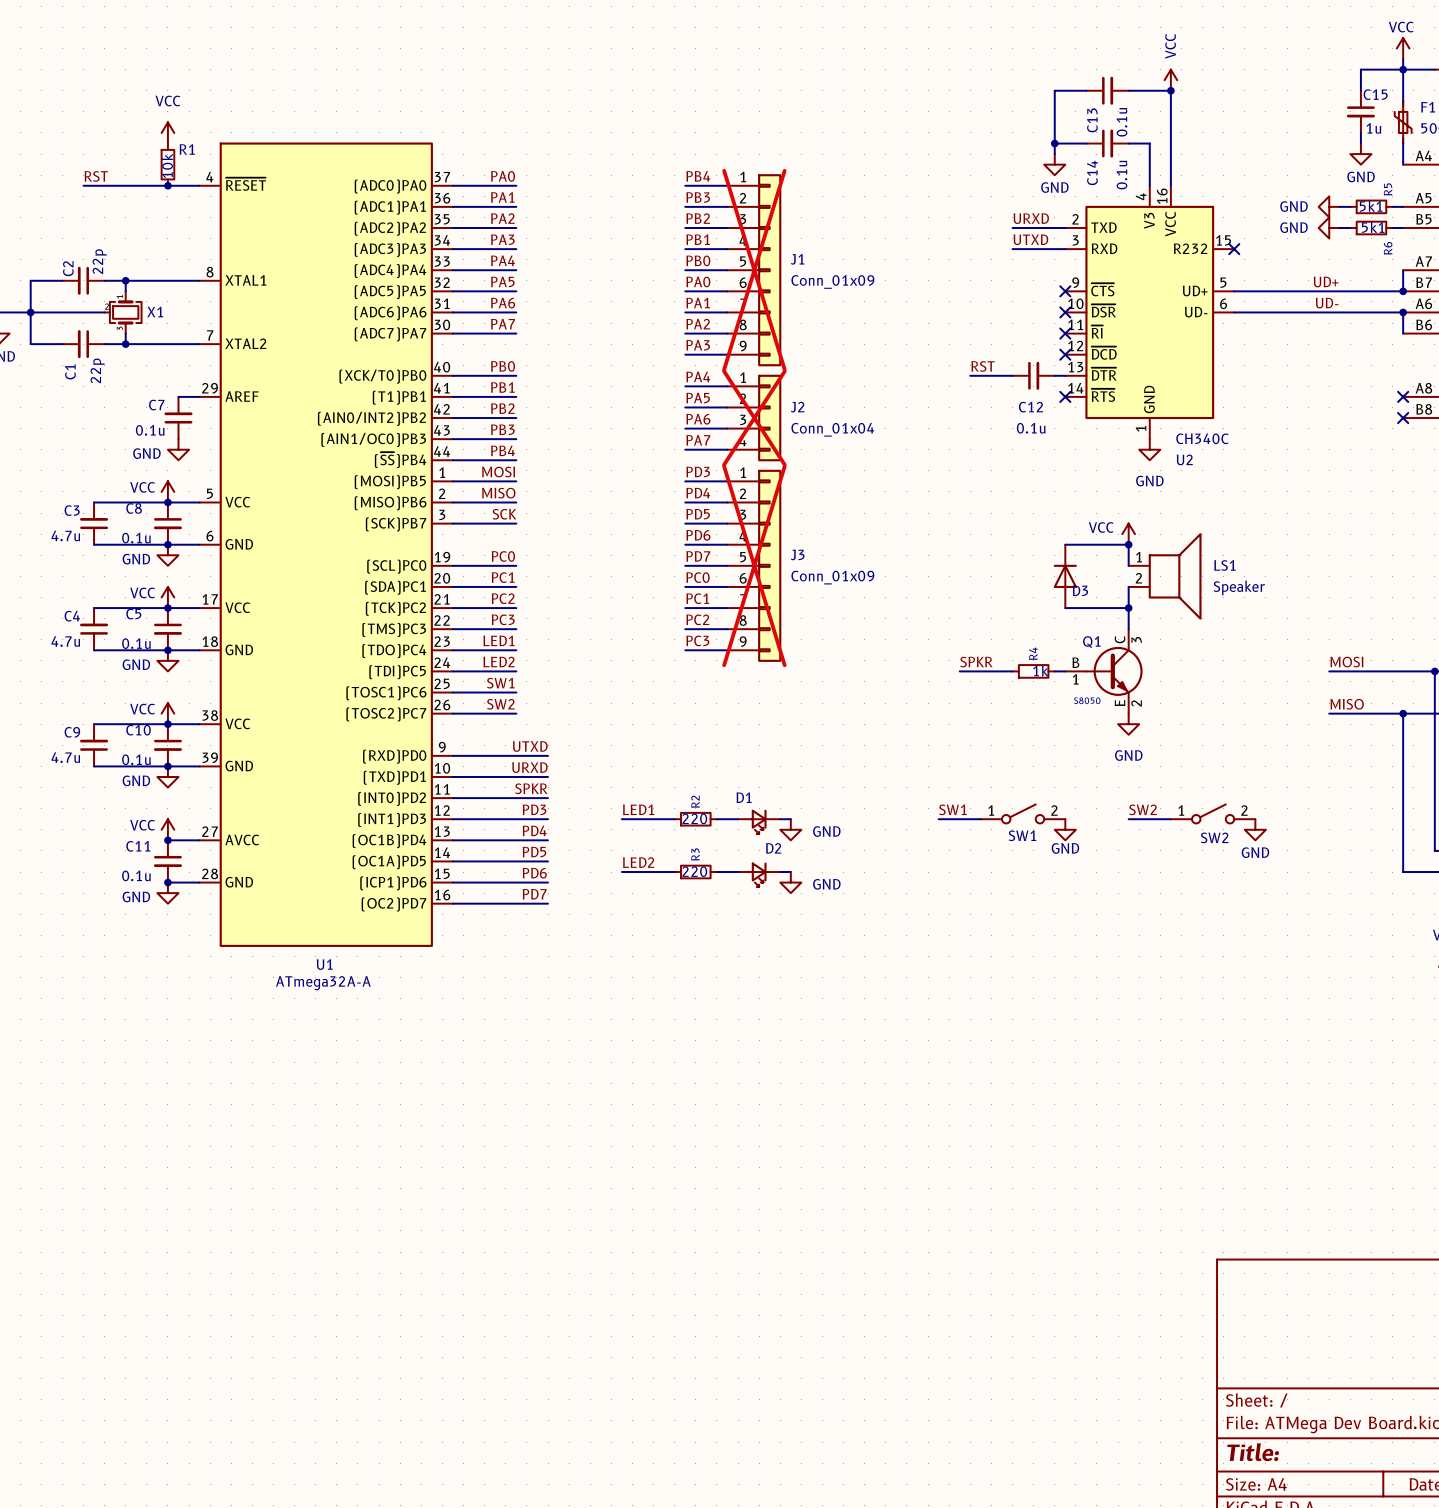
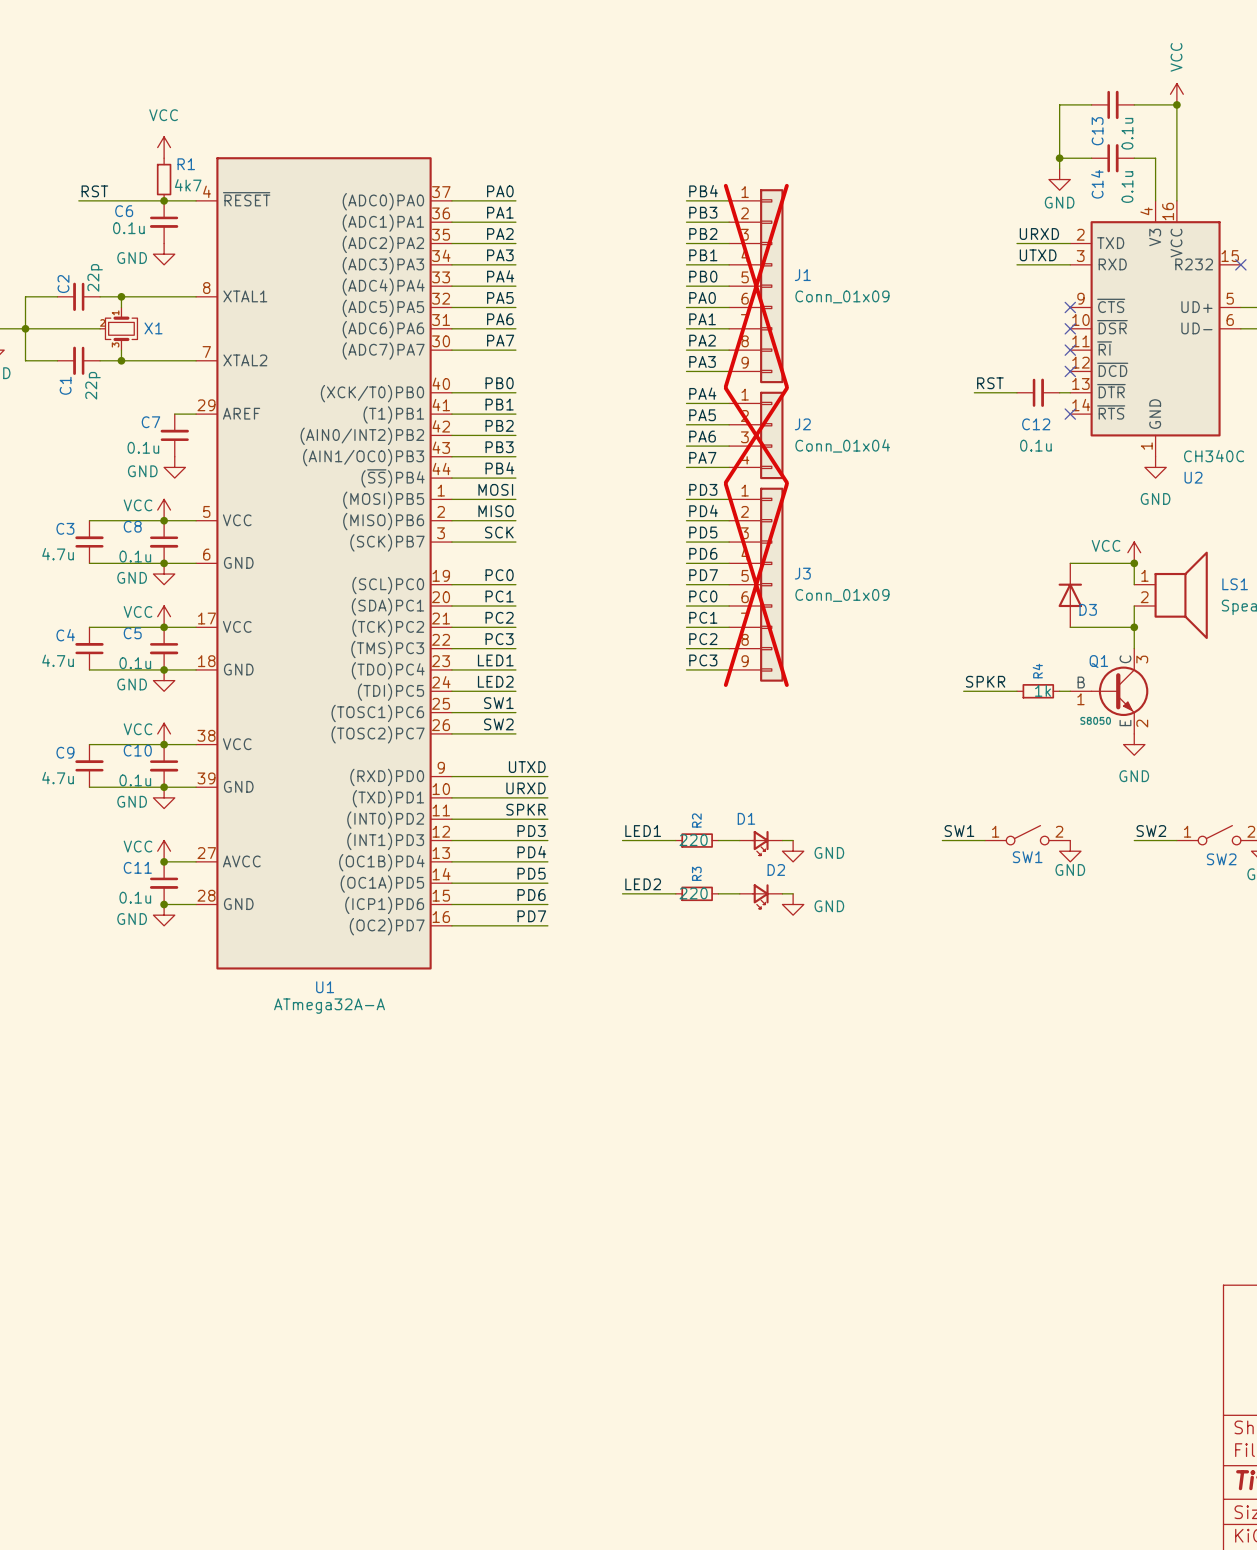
R1 value: 10k (167, 165) -> 4k7 (188, 185)
C6: none -> 0.1u (164, 222)
power symbol: none -> GND (164, 254)

